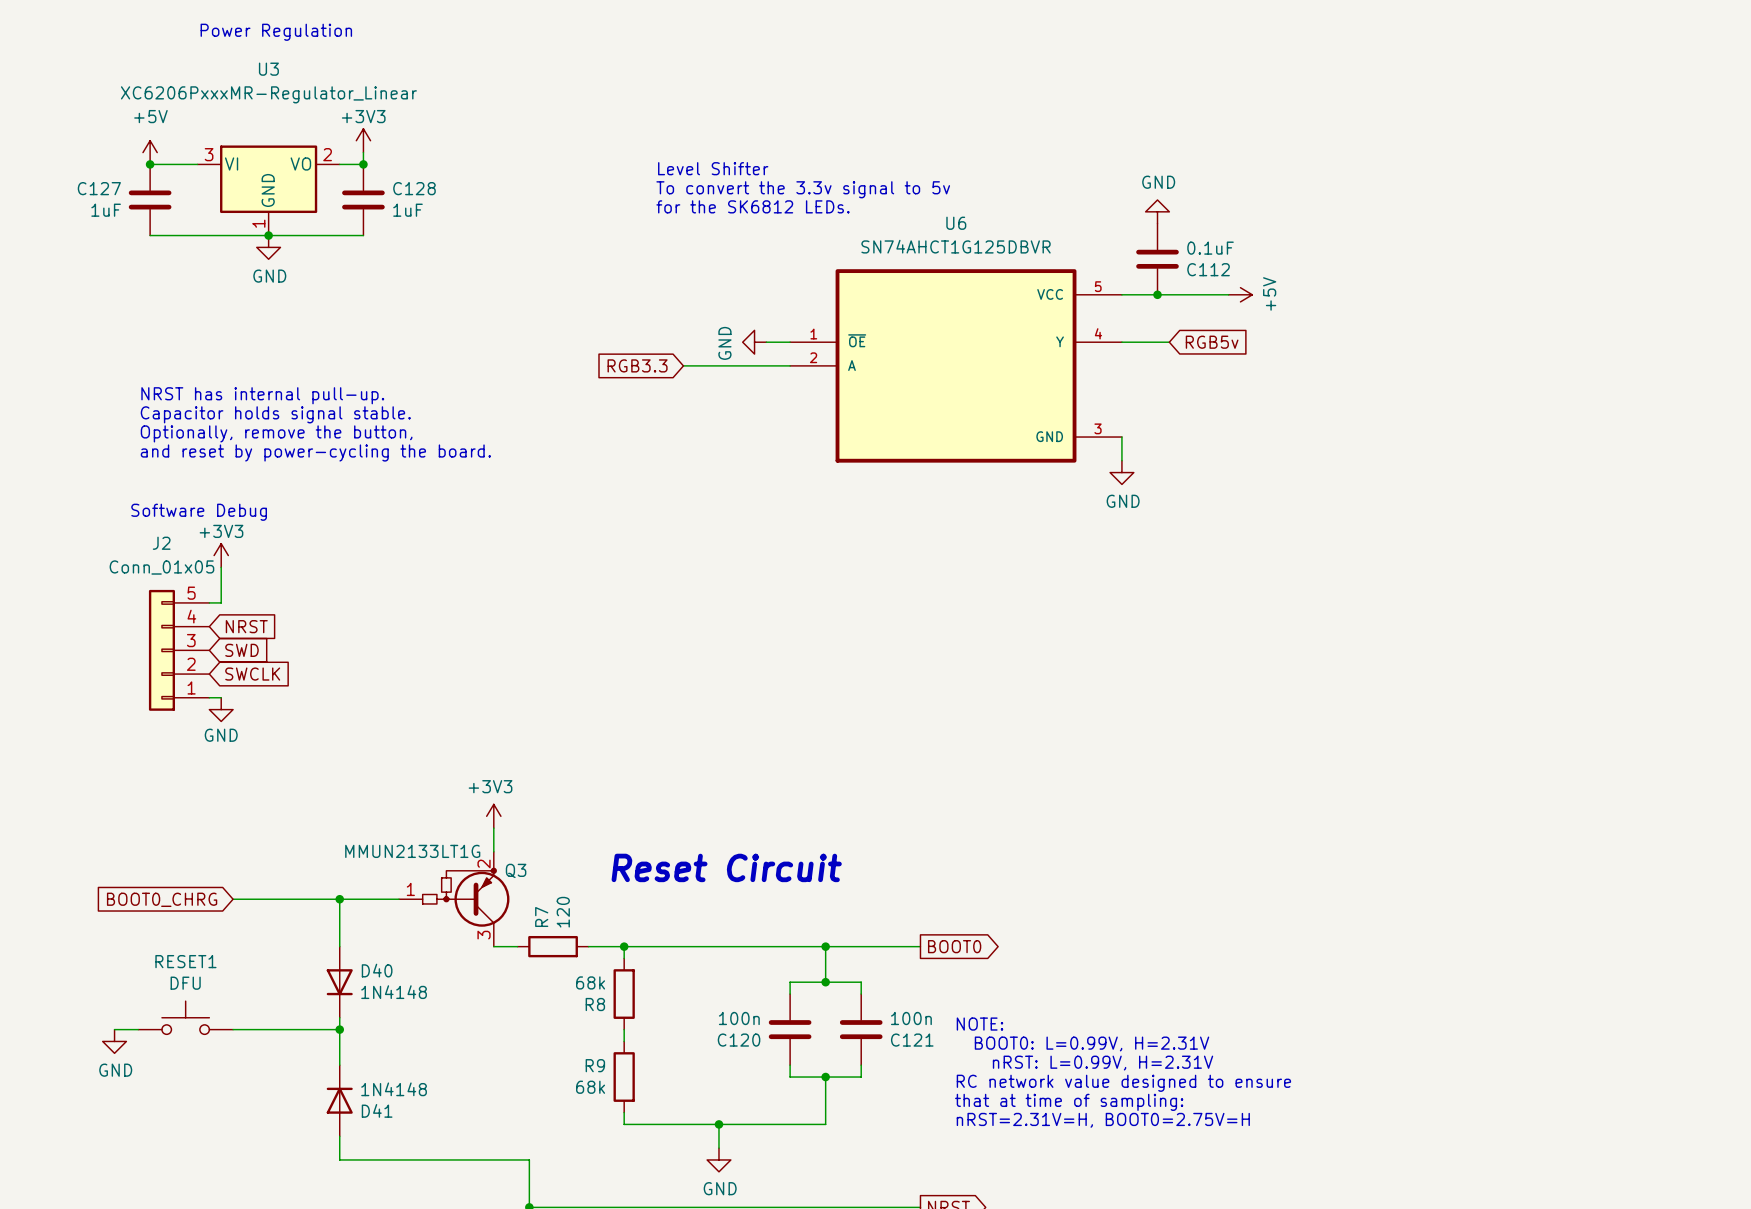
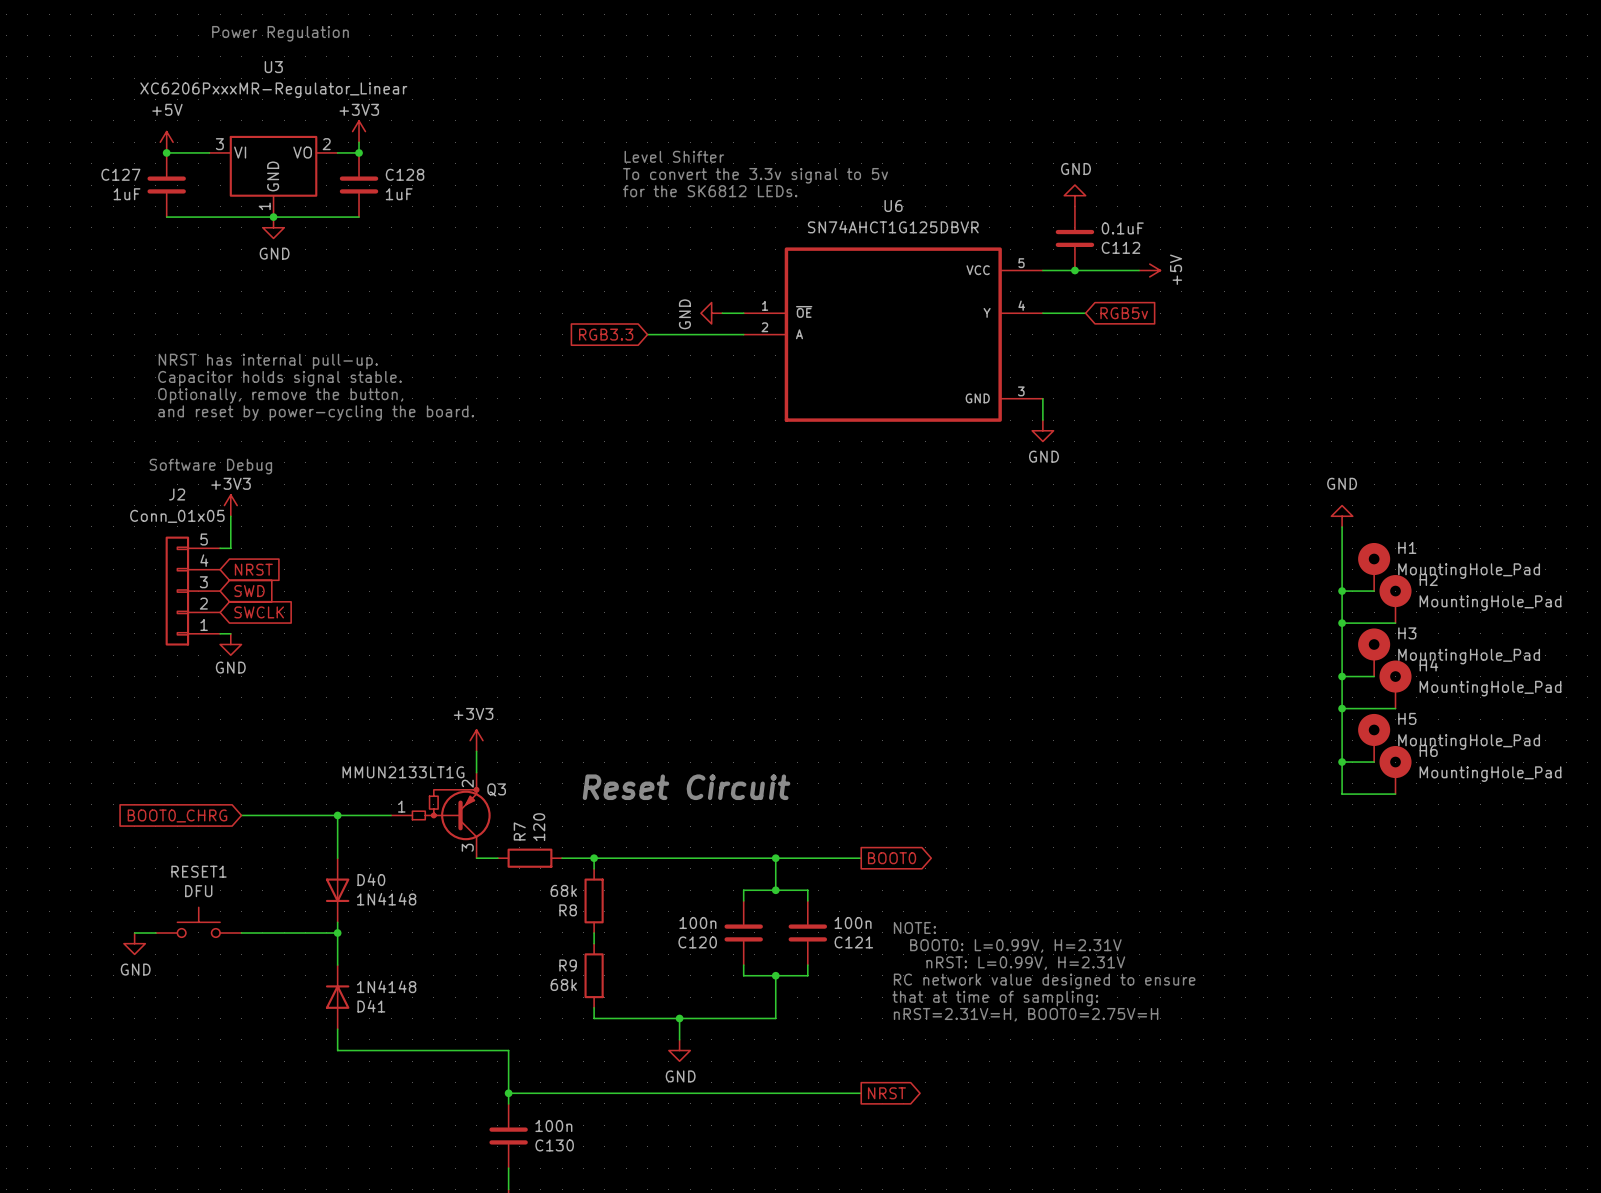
power symbol: none -> GND (1342, 516)
wire: none -> (1342, 526) (1342, 794) (1395, 794)
H1: none -> MountingHole_Pad (1374, 567)
wire: none -> (1342, 591) (1374, 591)
junction: none -> (1342, 591)
H2: none -> MountingHole_Pad (1395, 599)
wire: none -> (1342, 623) (1395, 623)
junction: none -> (1342, 623)
H3: none -> MountingHole_Pad (1374, 652)
wire: none -> (1342, 676) (1374, 676)
junction: none -> (1342, 676)
H4: none -> MountingHole_Pad (1395, 684)
wire: none -> (1342, 708) (1395, 708)
junction: none -> (1342, 708)
H5: none -> MountingHole_Pad (1374, 737)
wire: none -> (1342, 762) (1374, 762)
junction: none -> (1342, 762)
H6: none -> MountingHole_Pad (1395, 770)

